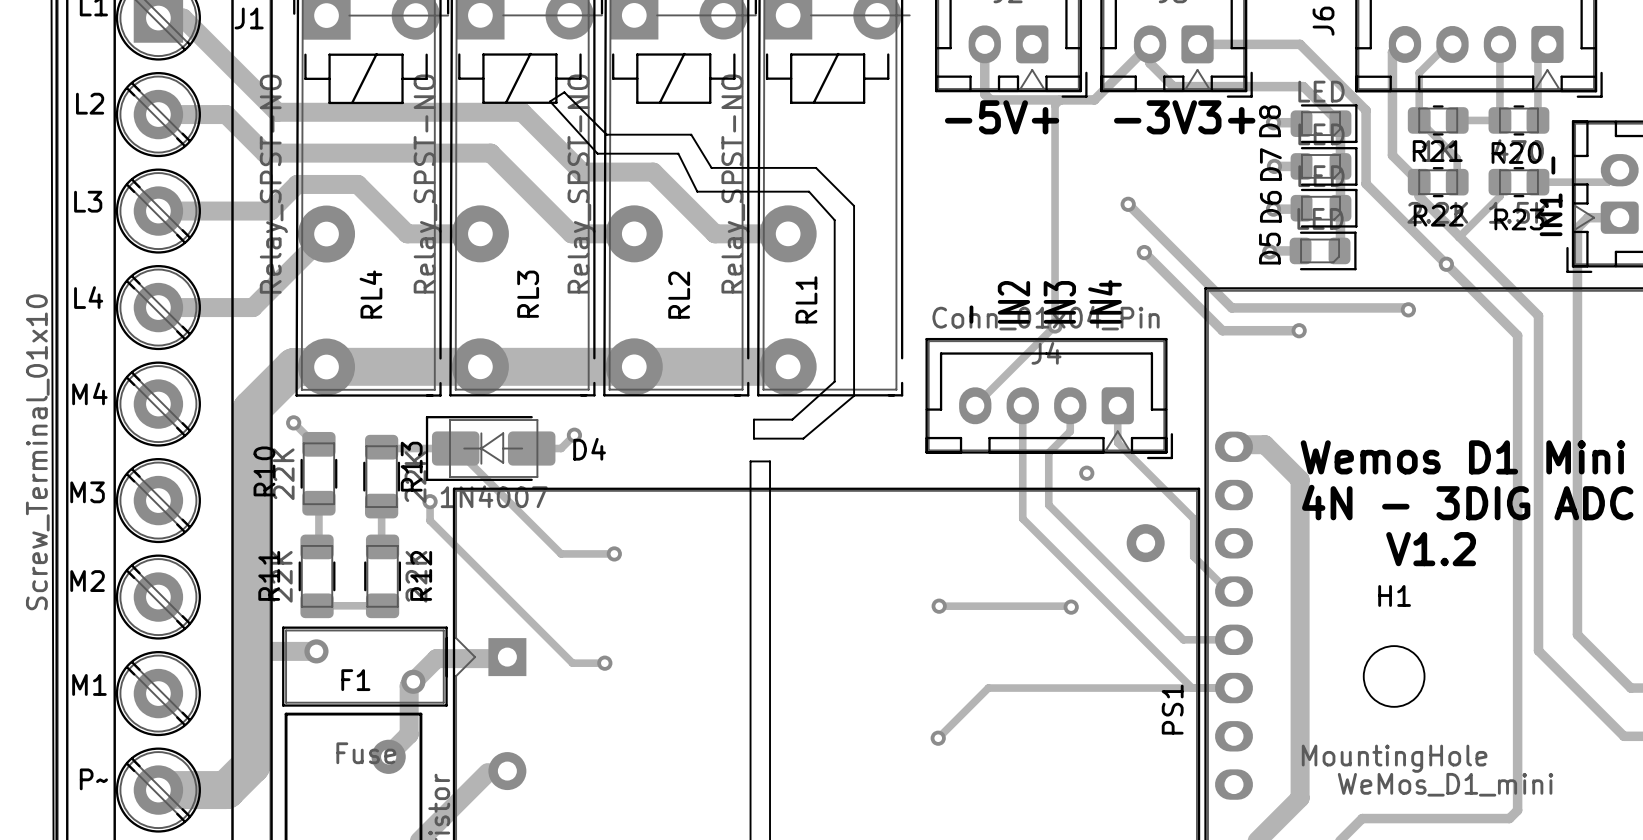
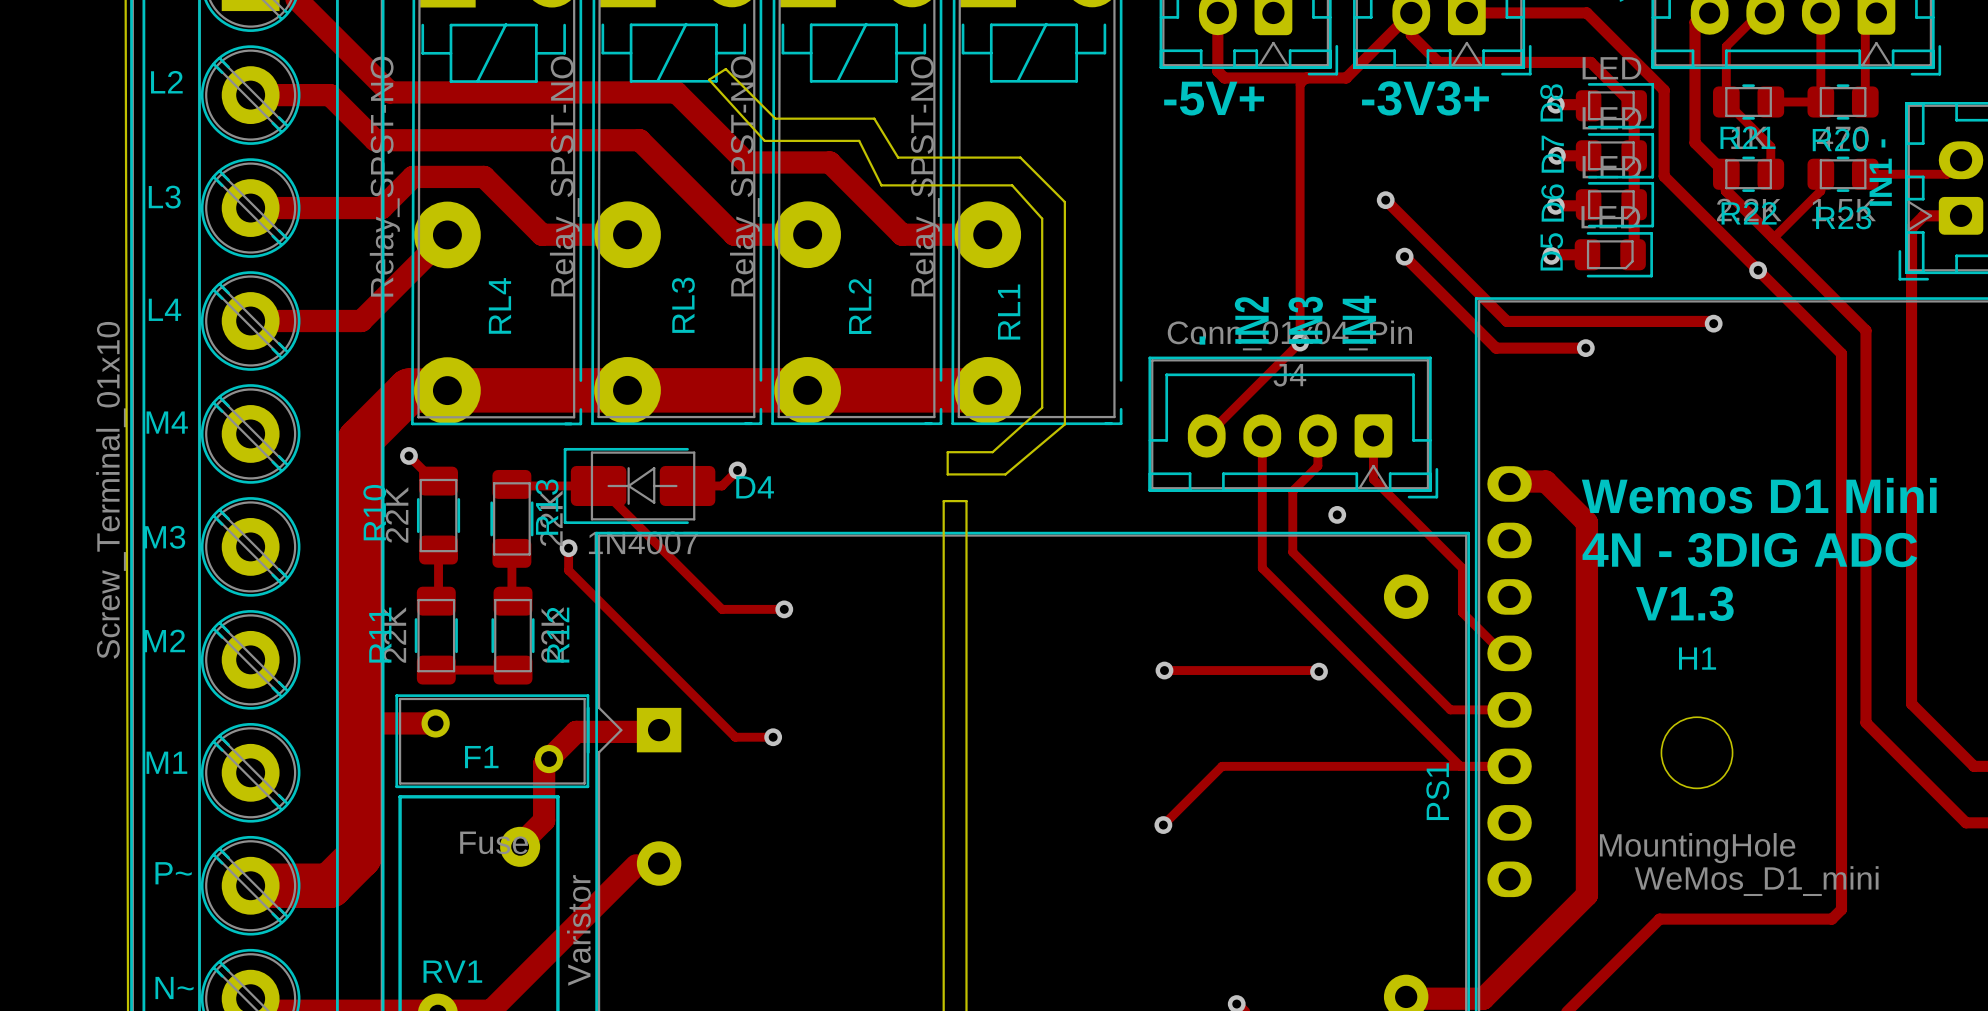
text: V1.2 (1431, 549) -> V1.3 (1684, 603)

